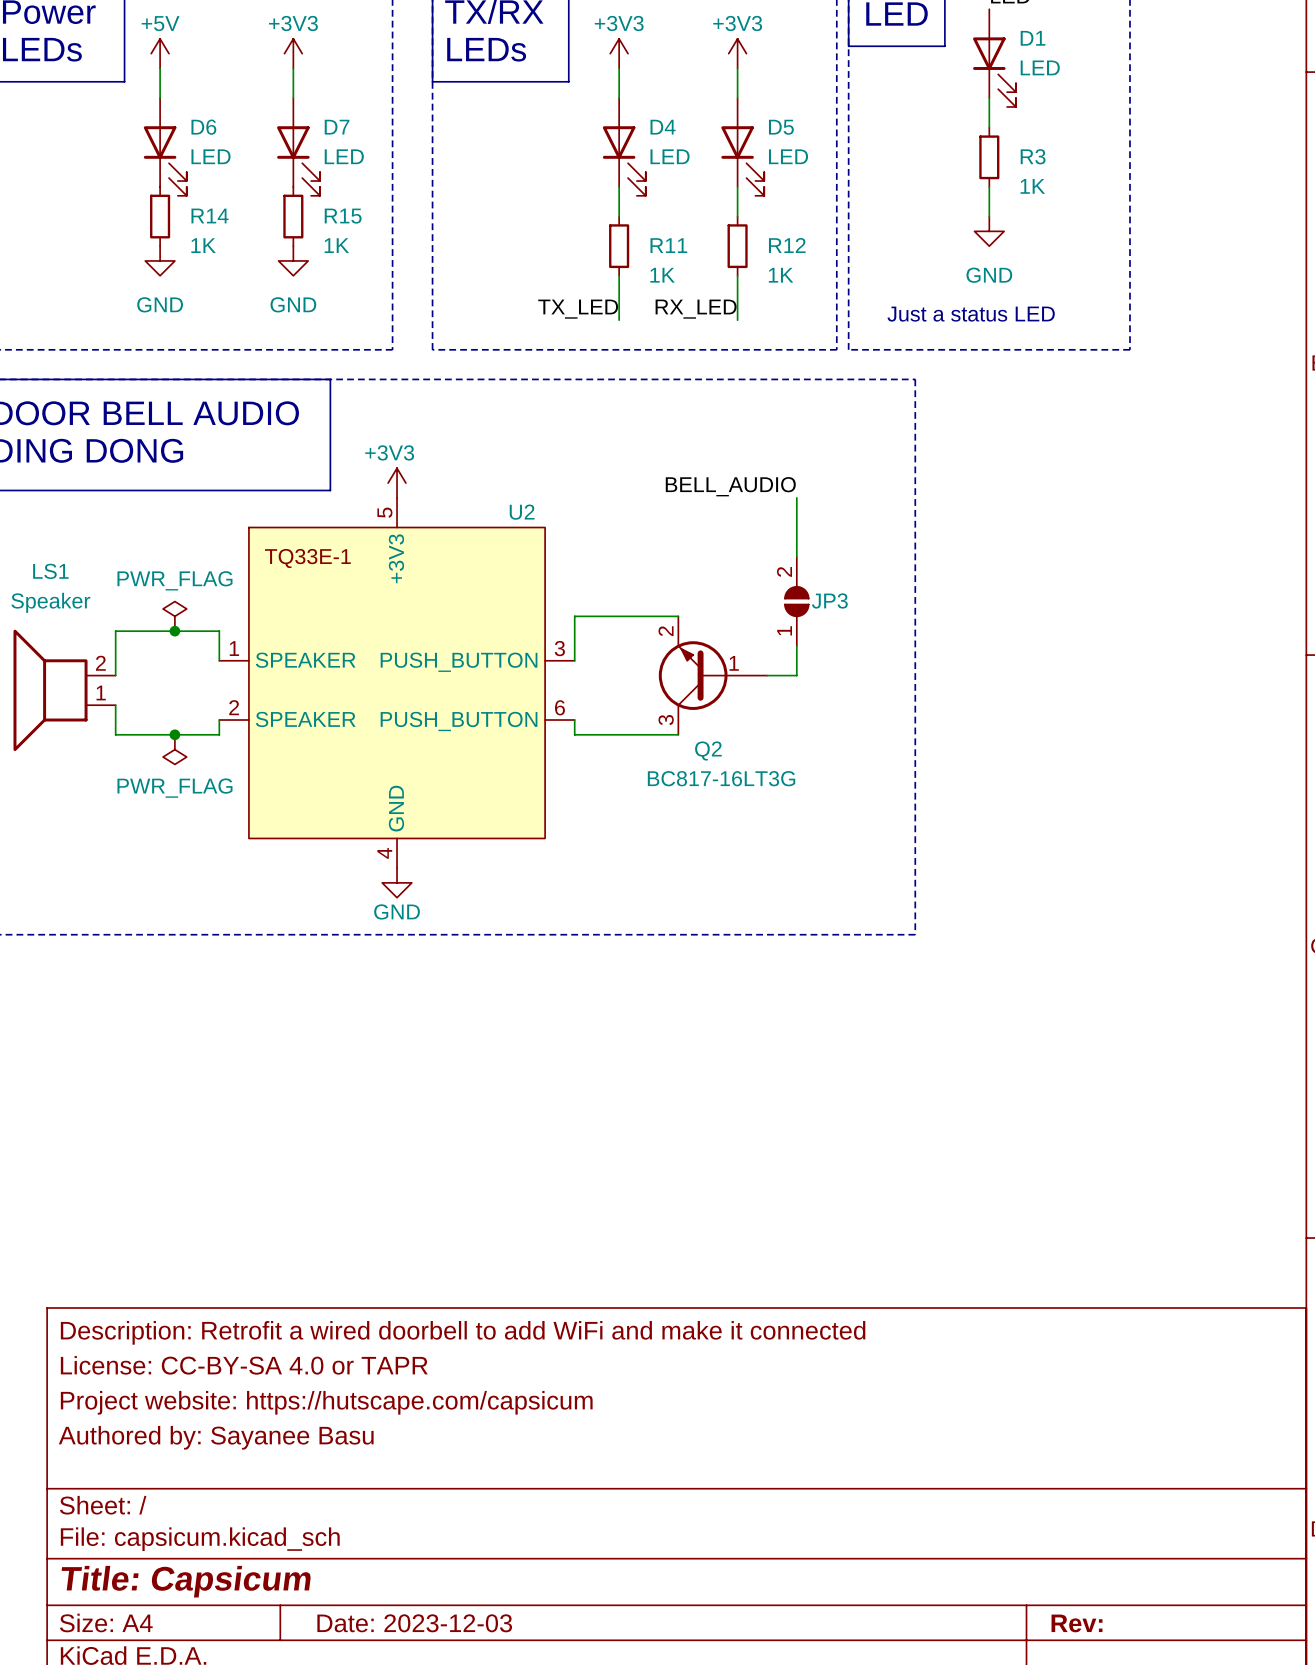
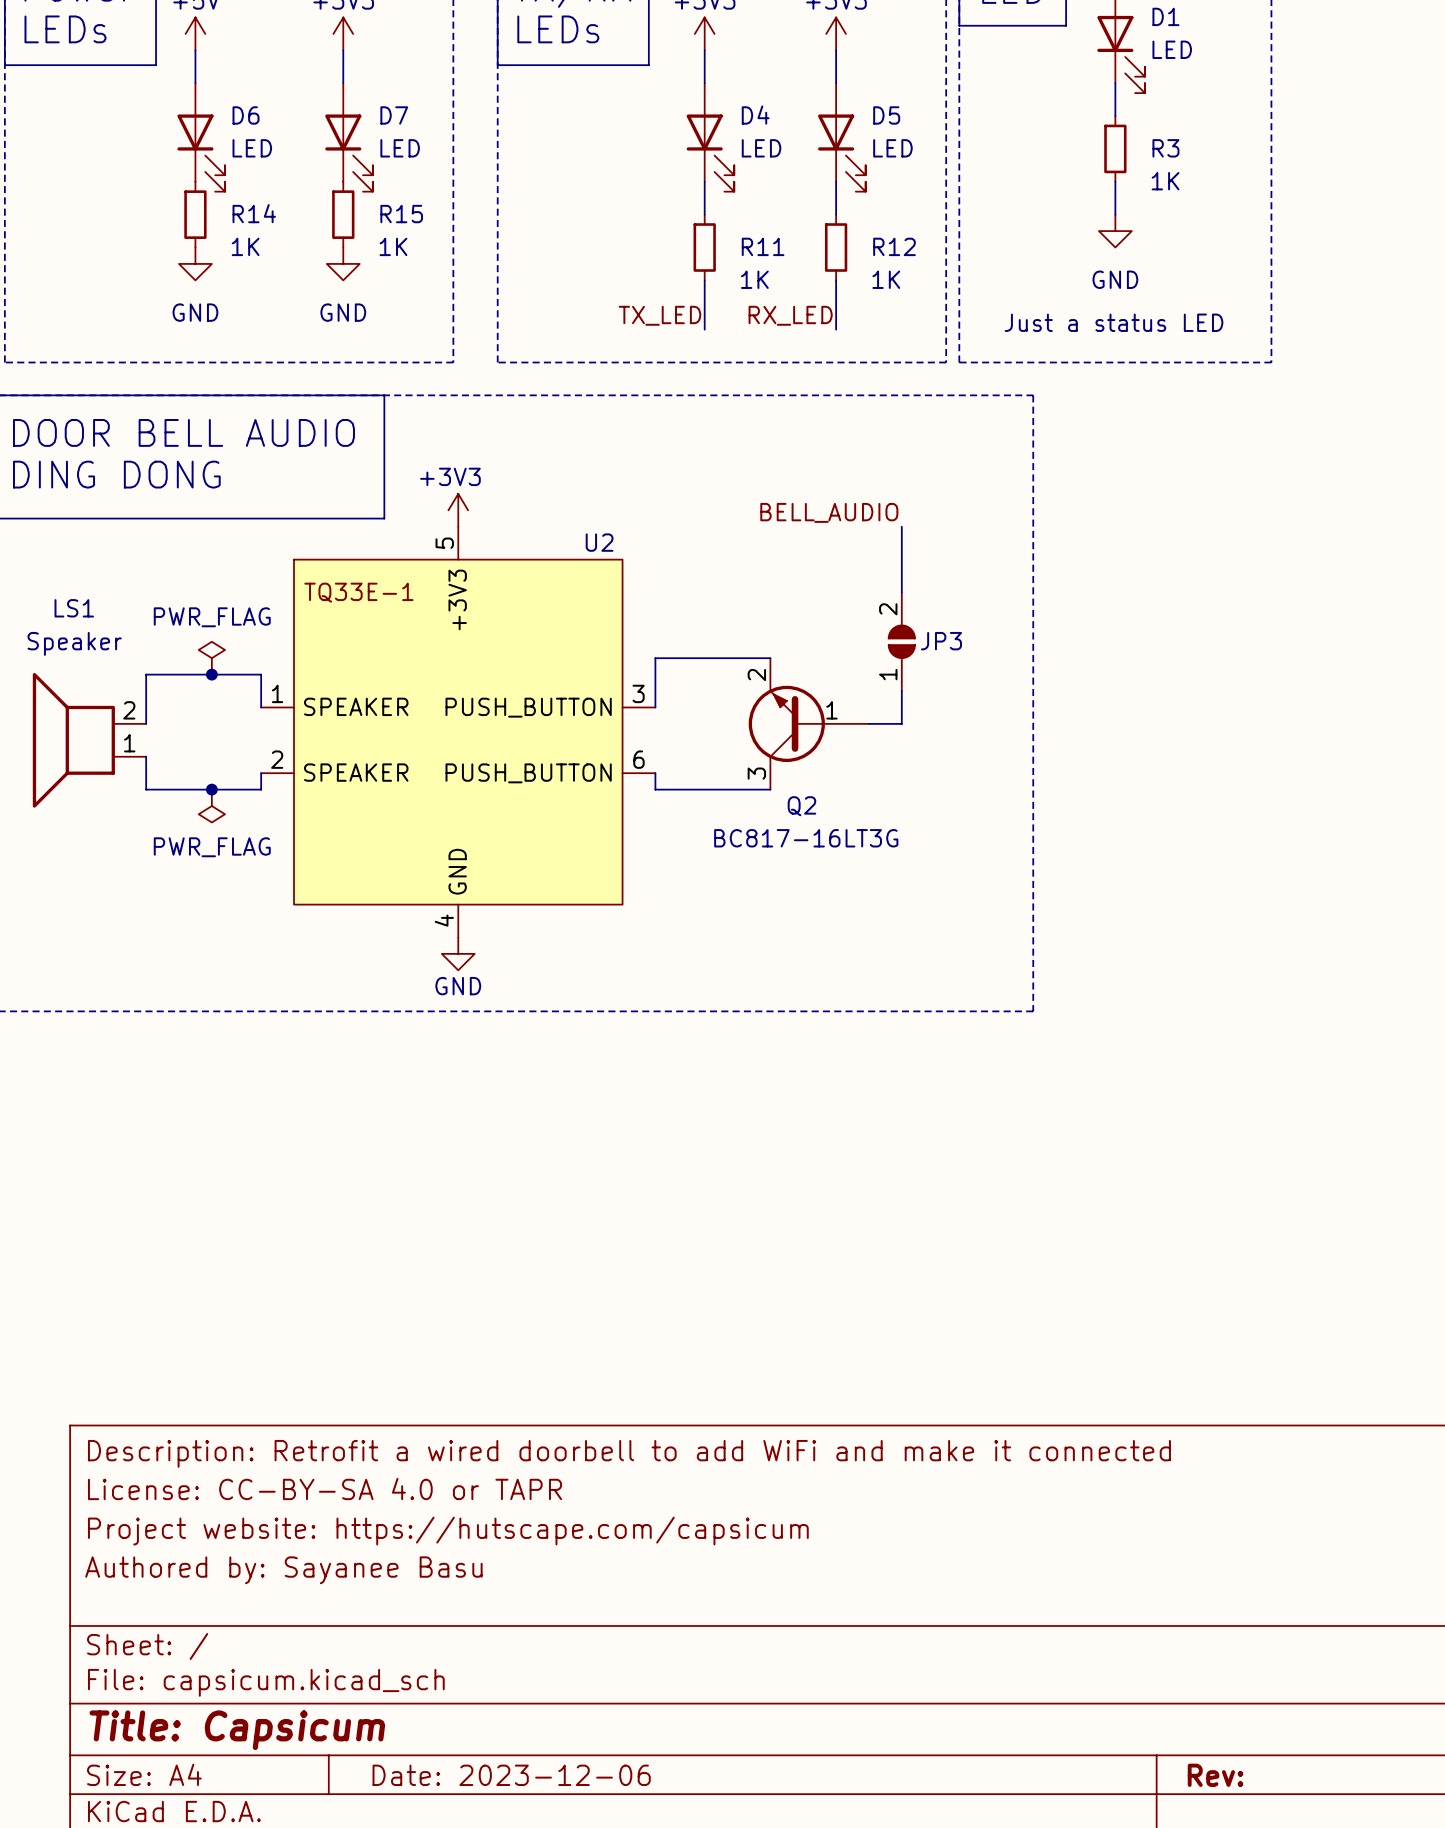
title block: Date: 2023-12-03 (414, 1623) -> Date: 2023-12-06 (511, 1775)

